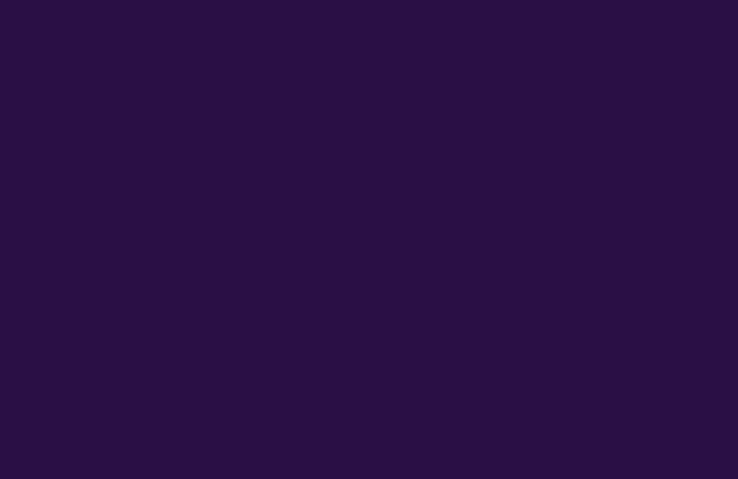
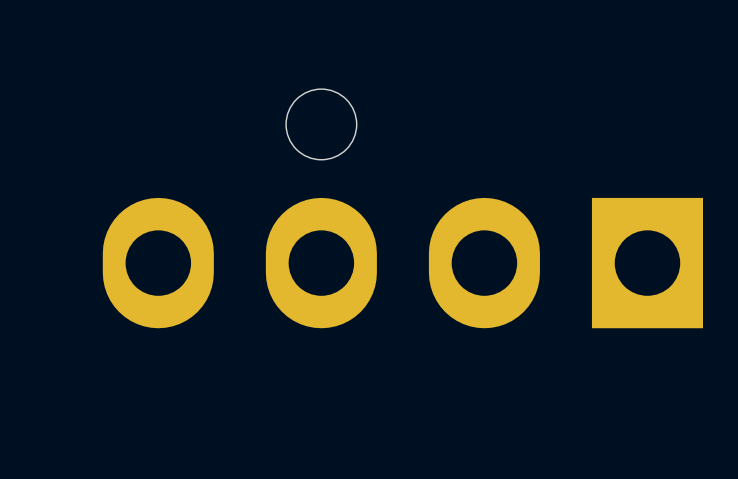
part: none -> (402, 208)

